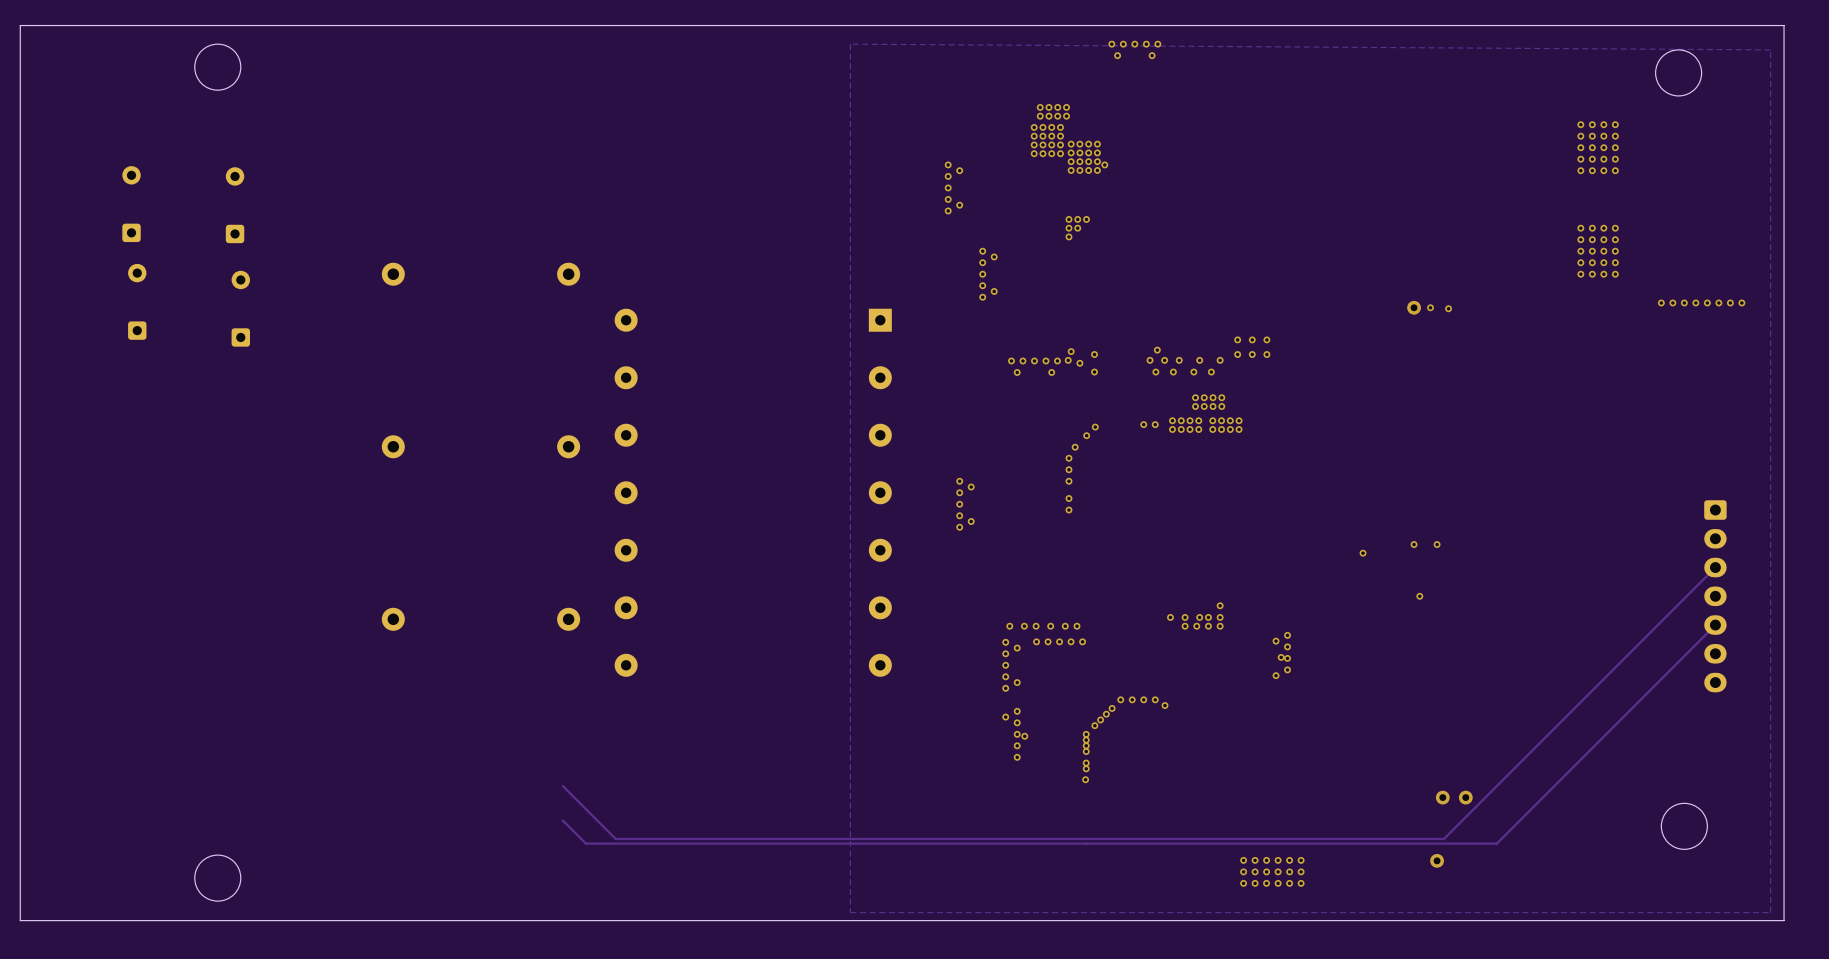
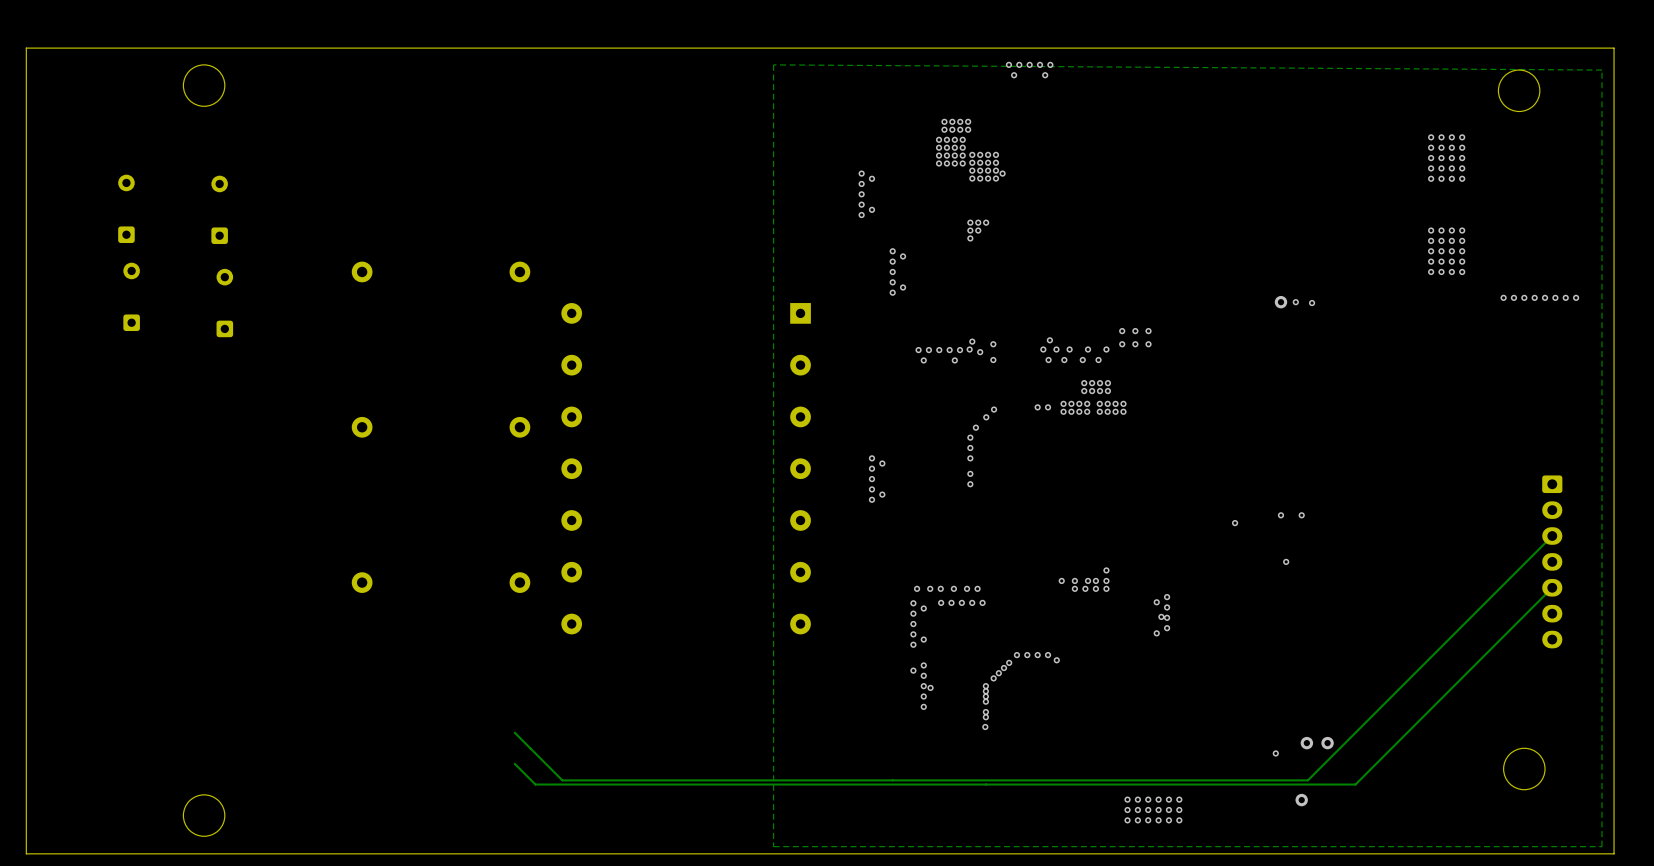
via: none -> (1275, 753)

